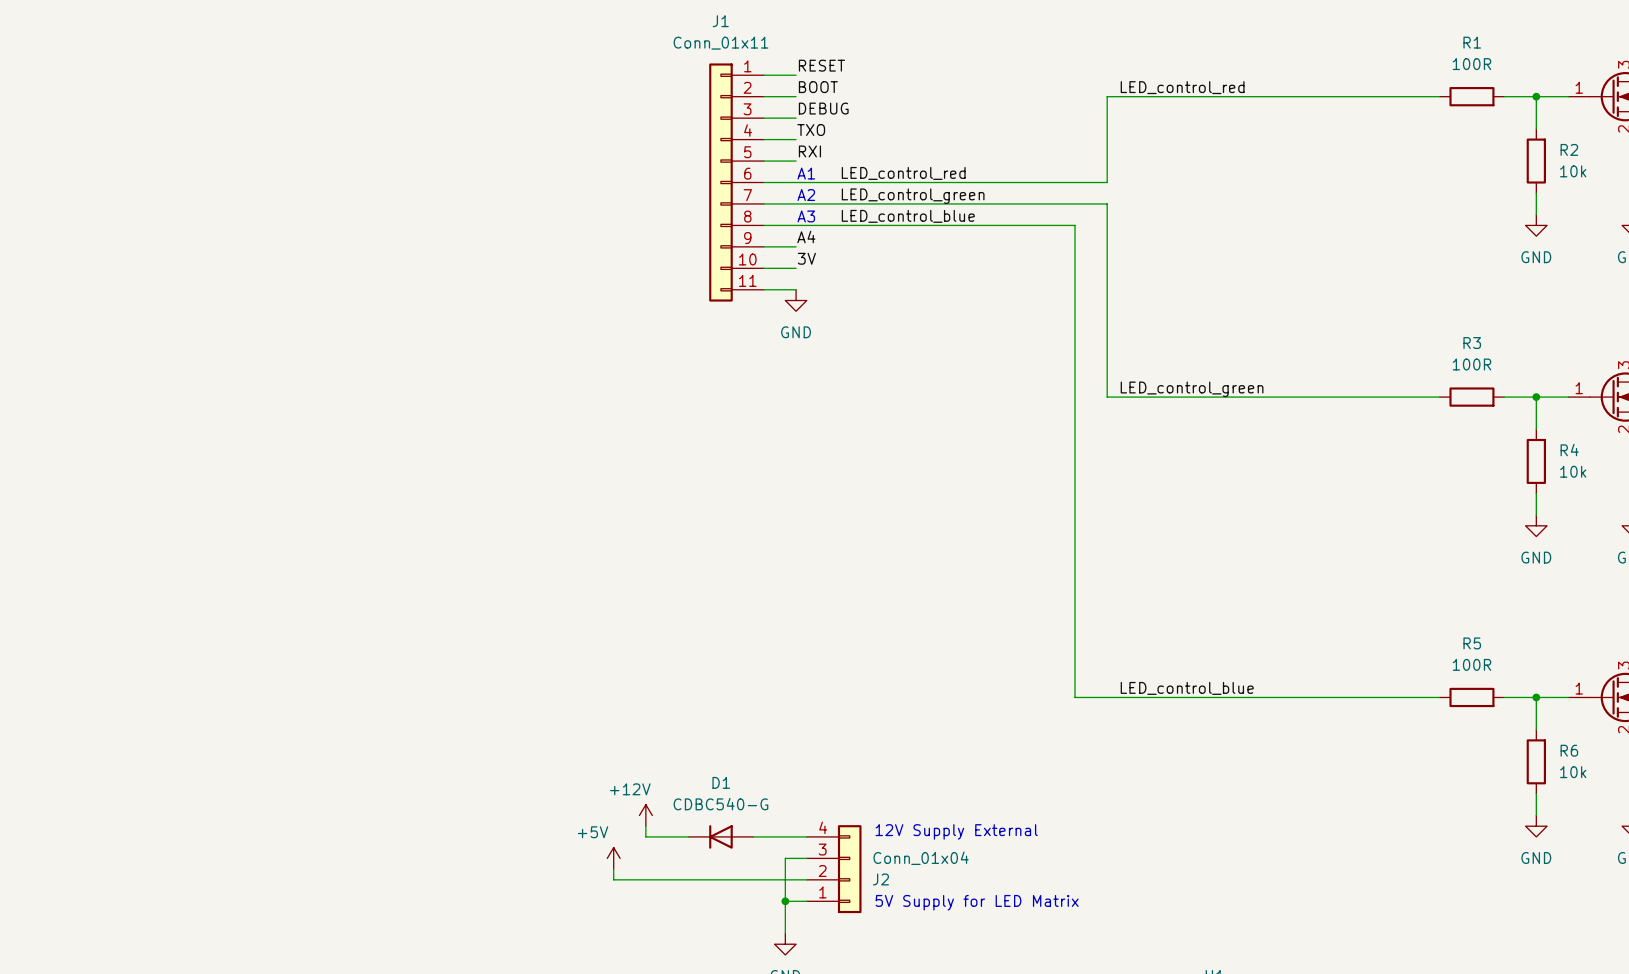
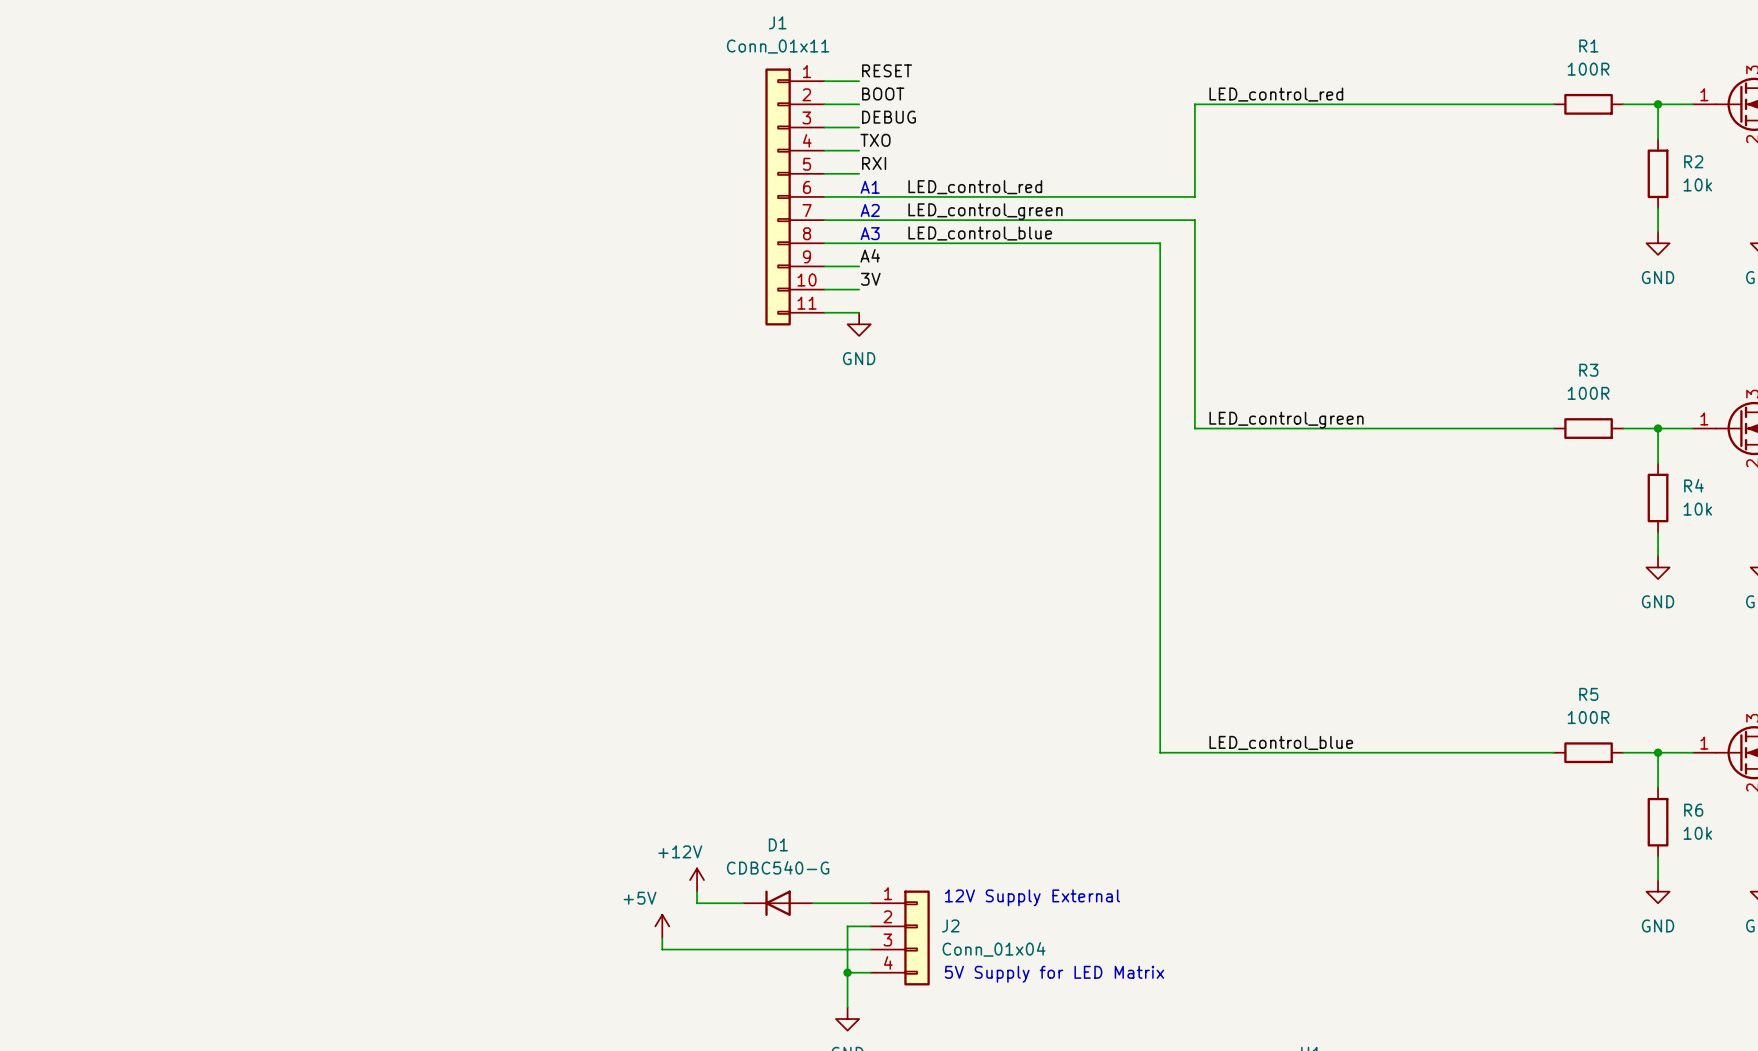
J2 flip: as is (849, 869) -> up-down (917, 937)

